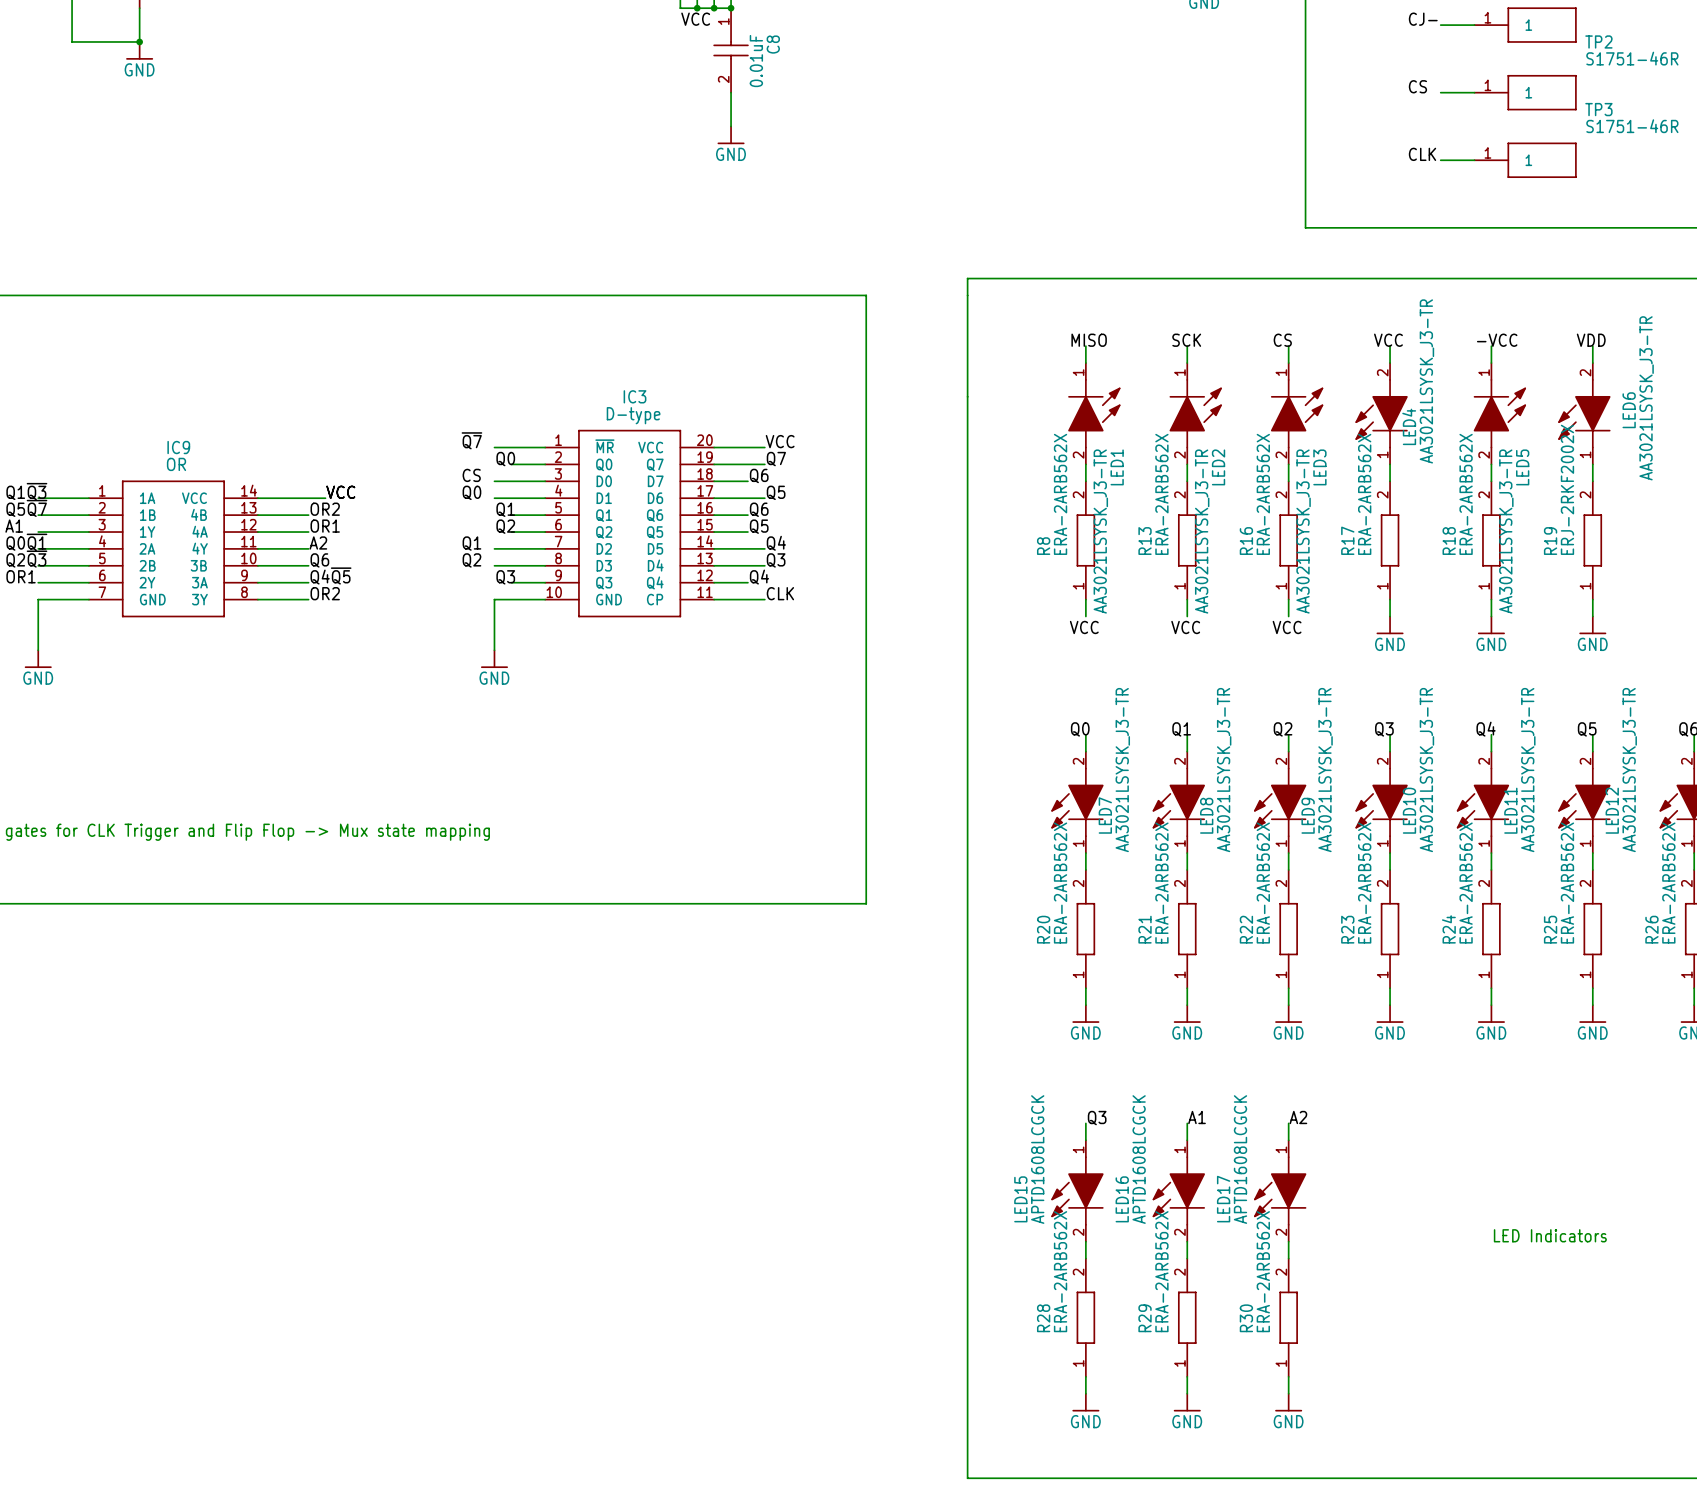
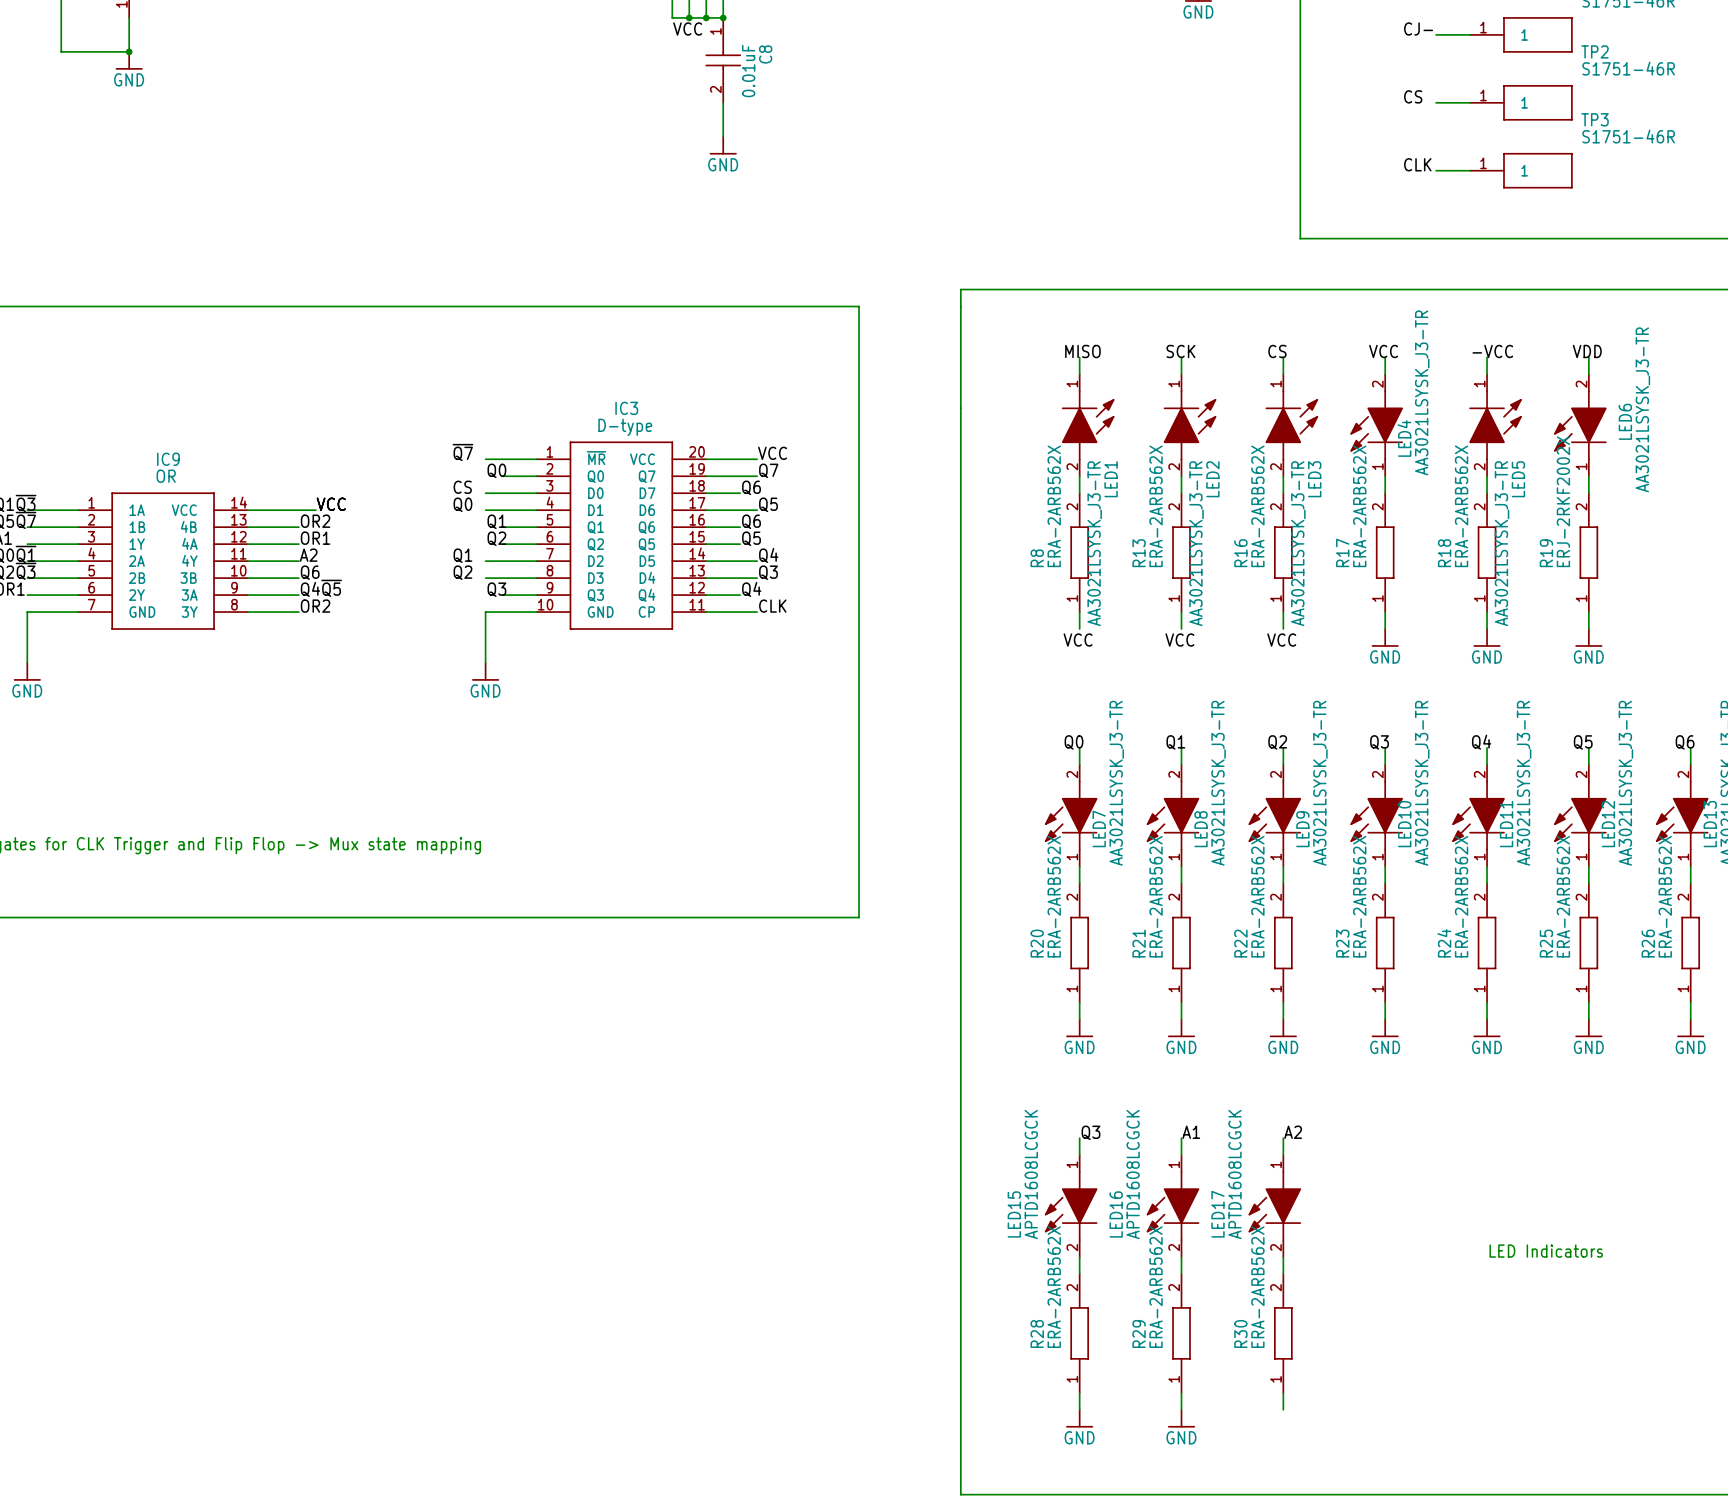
power symbol: GND (1288, 1402) -> none

